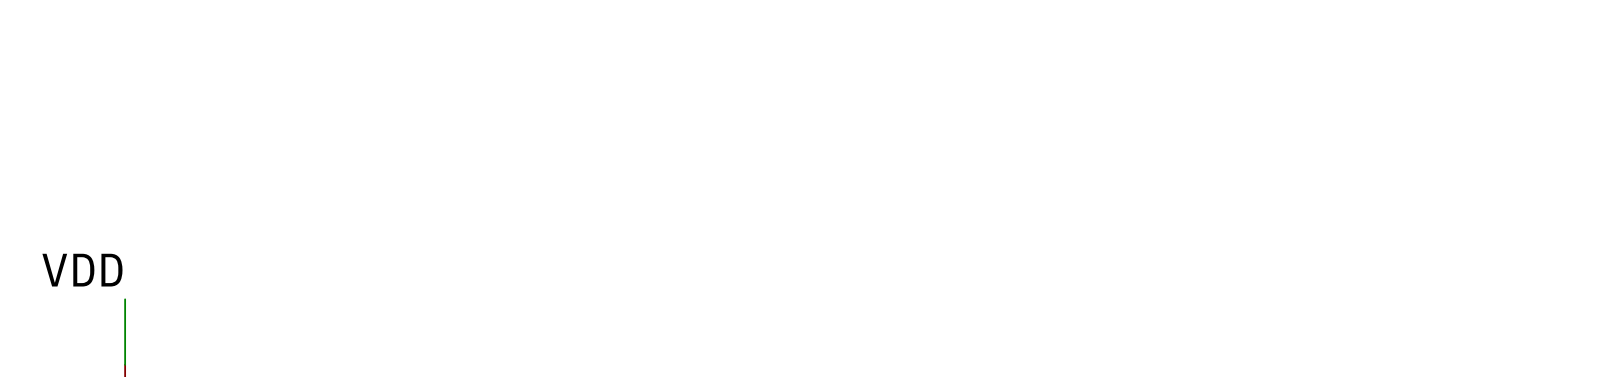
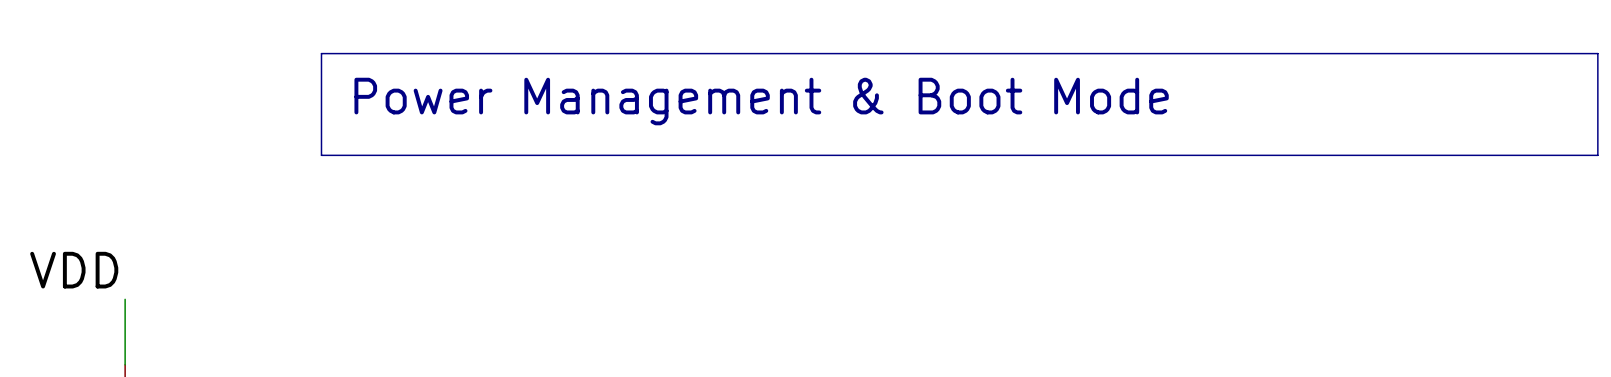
line: none -> (321, 53) (1597, 53) (1597, 155) (321, 155) (321, 53)
text: none -> Power Management & Boot Mode (761, 101)

